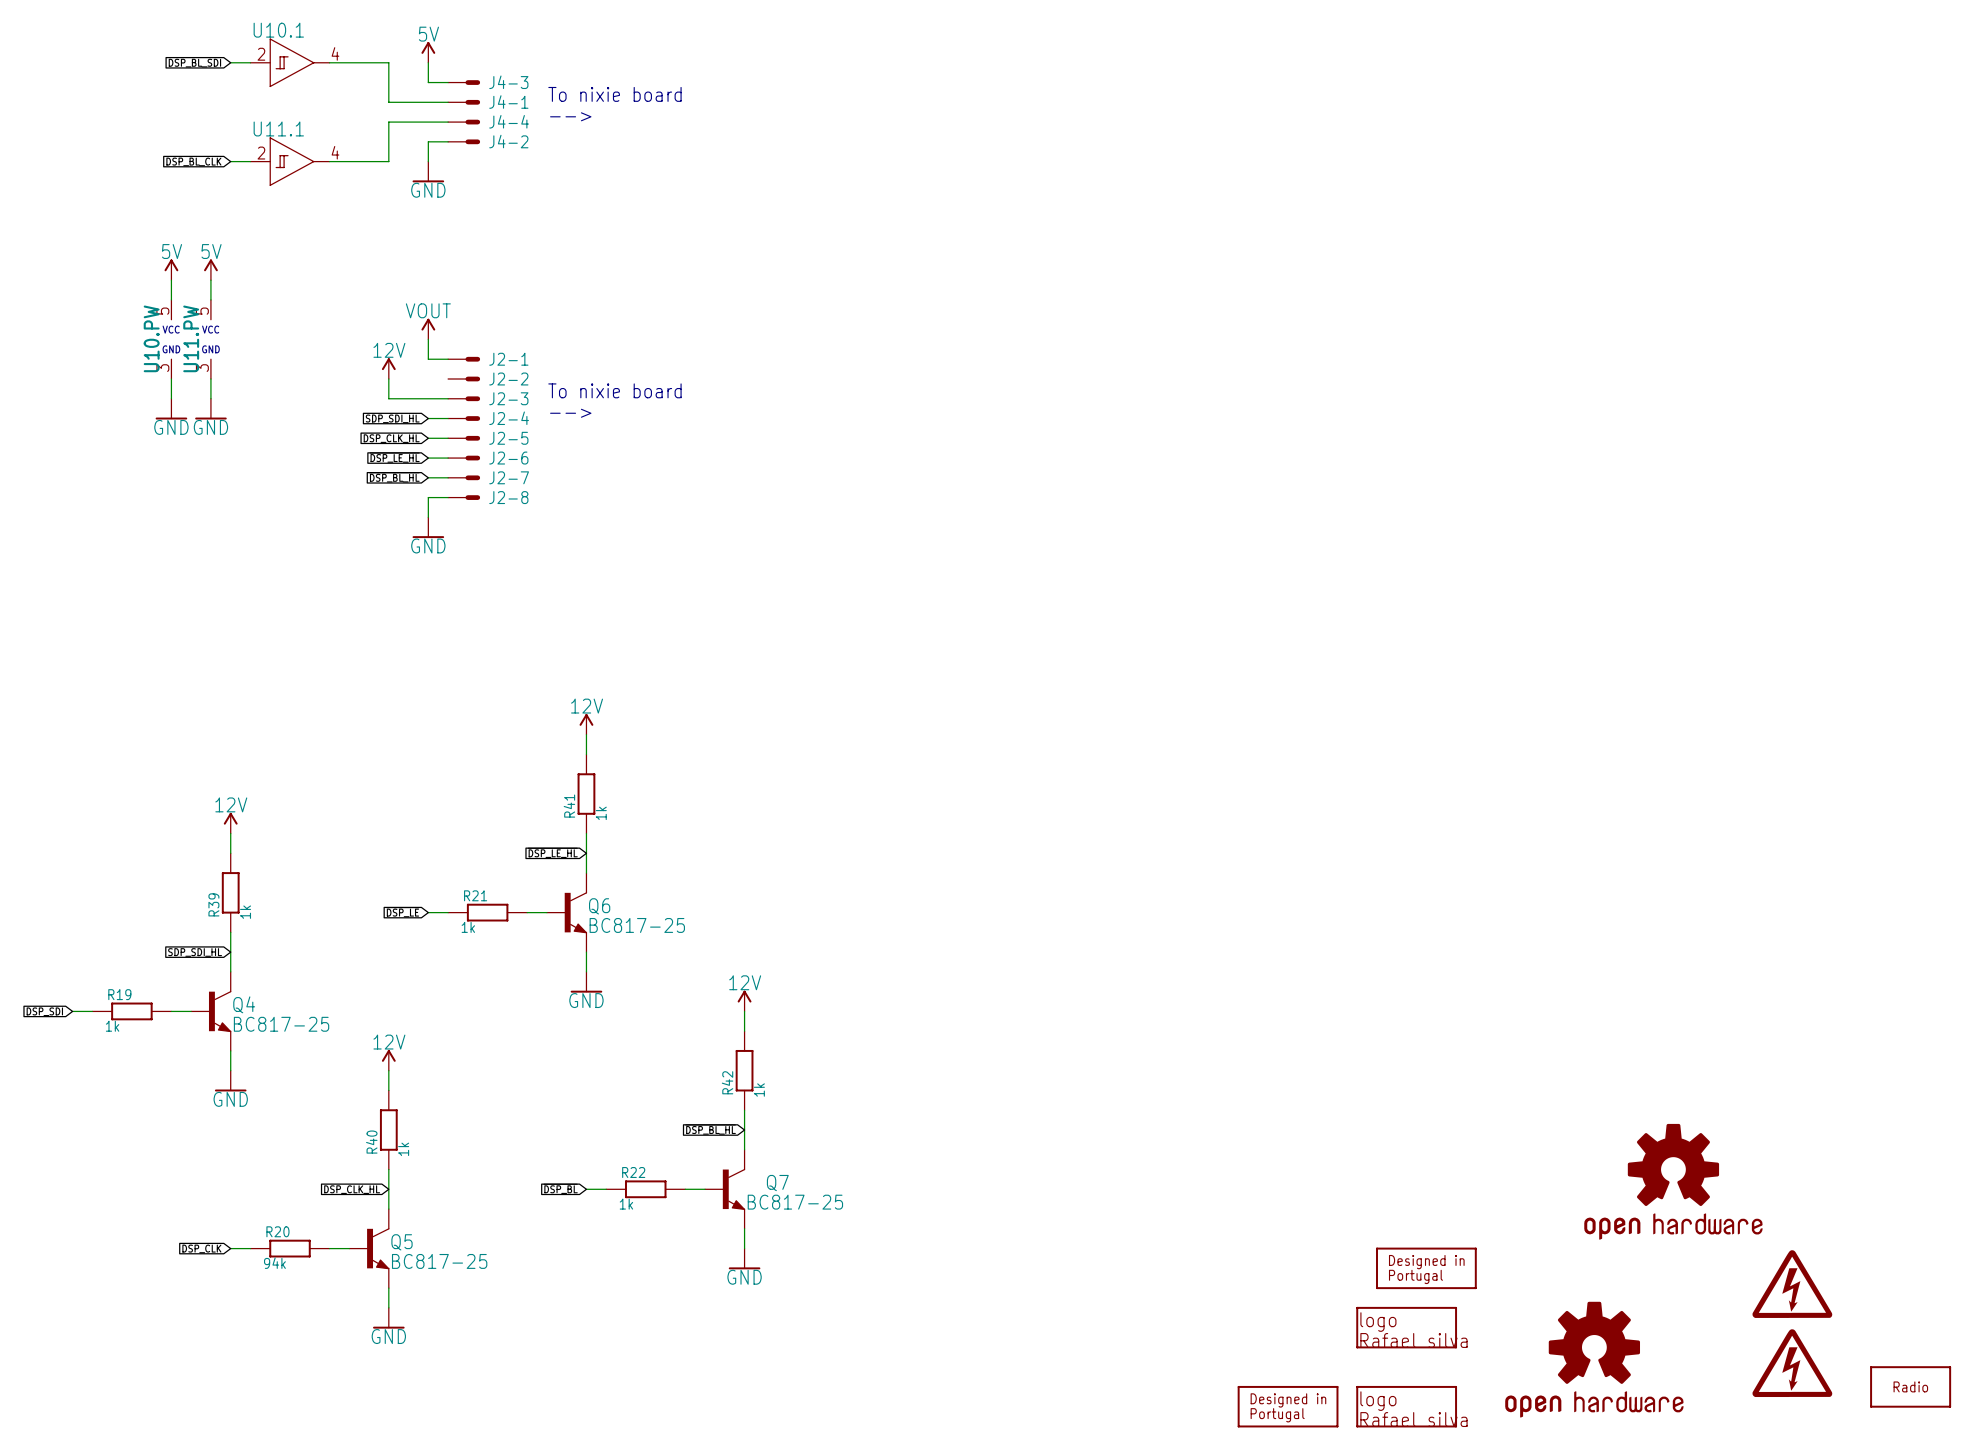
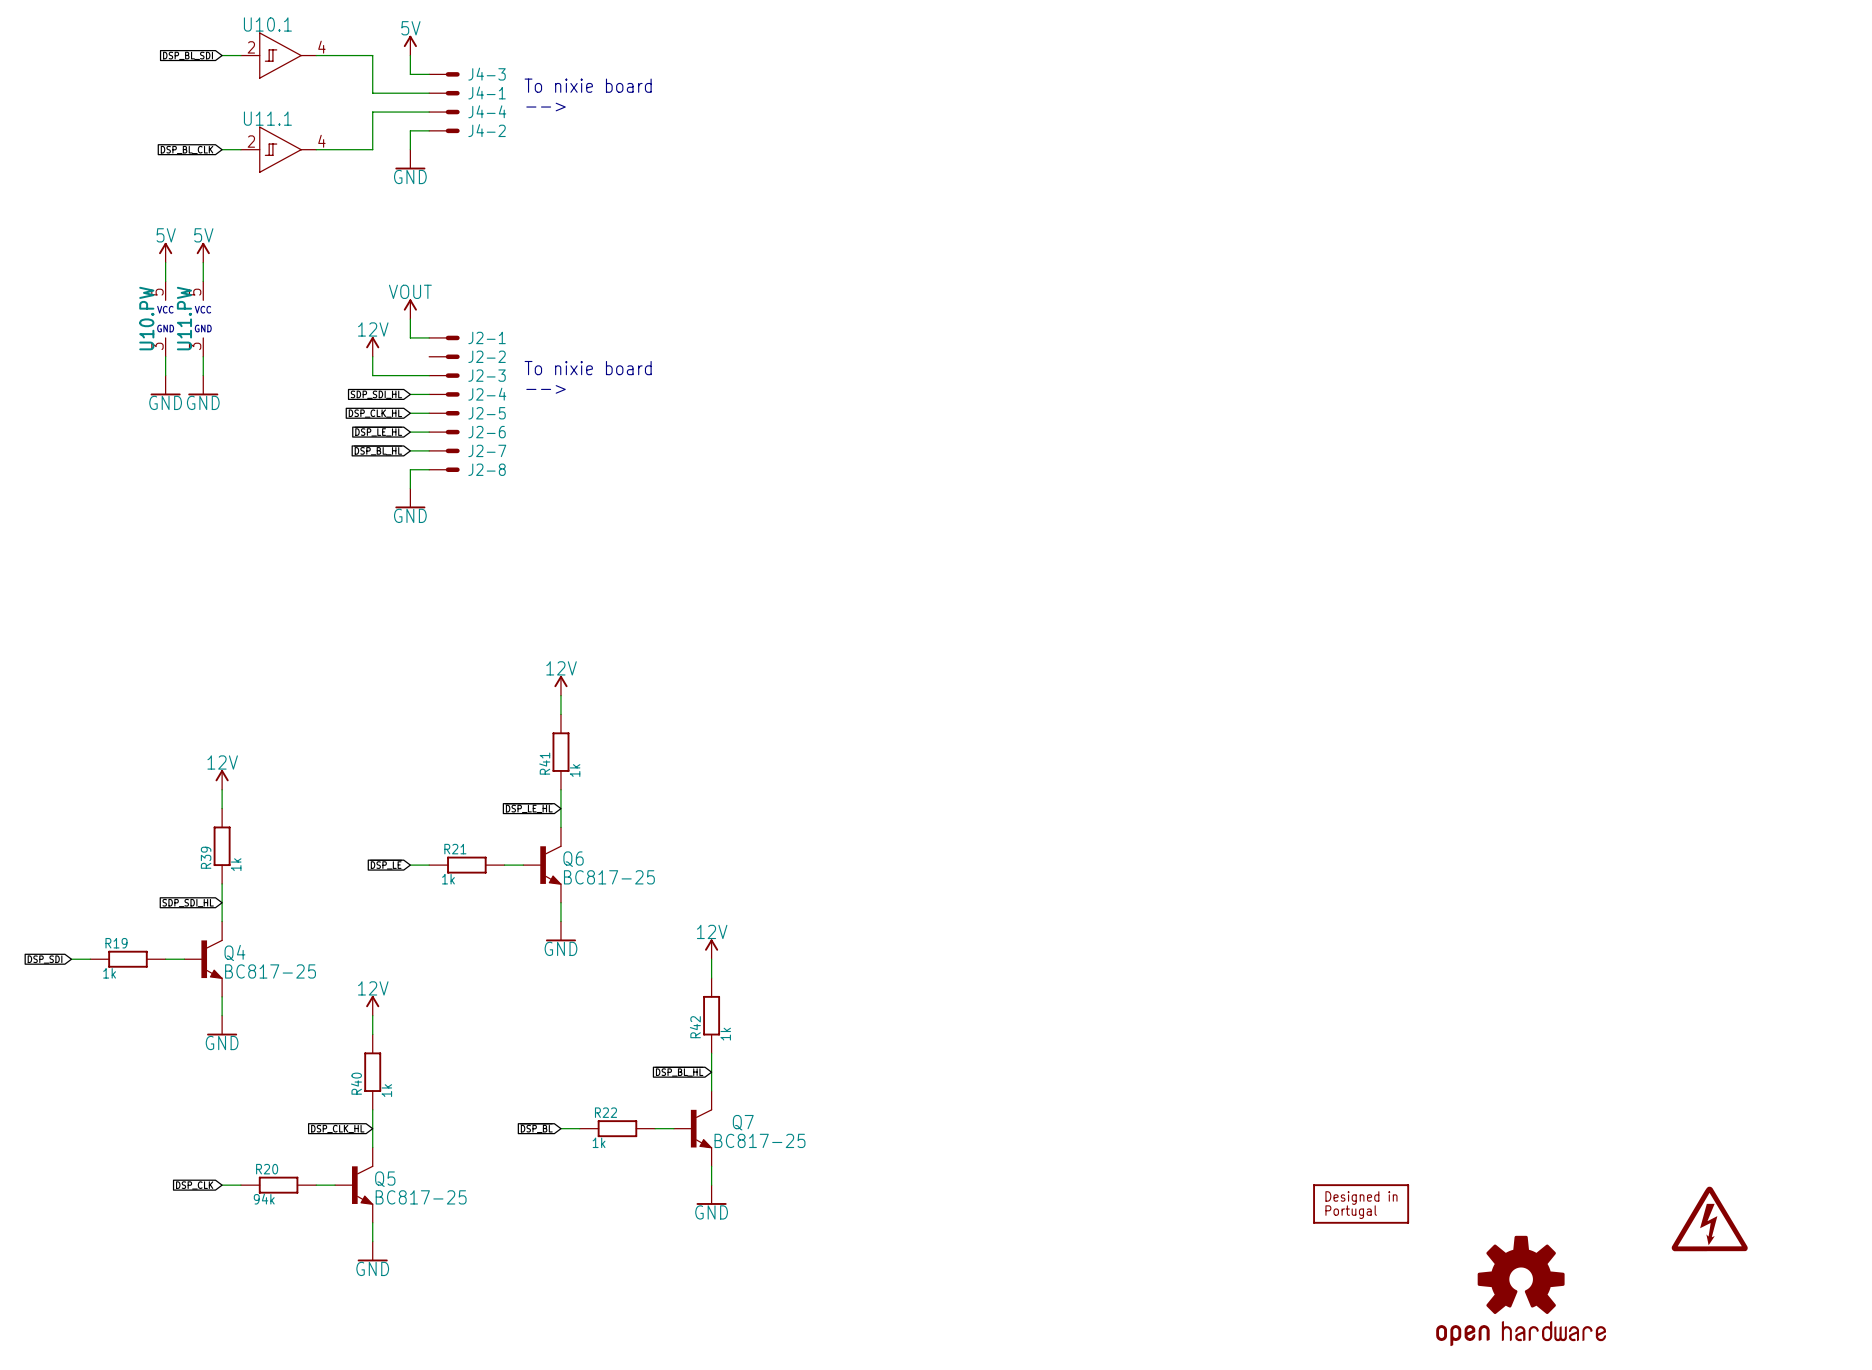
part: (1673, 1181) -> none
part: (1406, 1327) -> none
part: (1792, 1363) -> none
part: (1910, 1386) -> none
part: (1288, 1406) -> none
part: (1406, 1406) -> none

